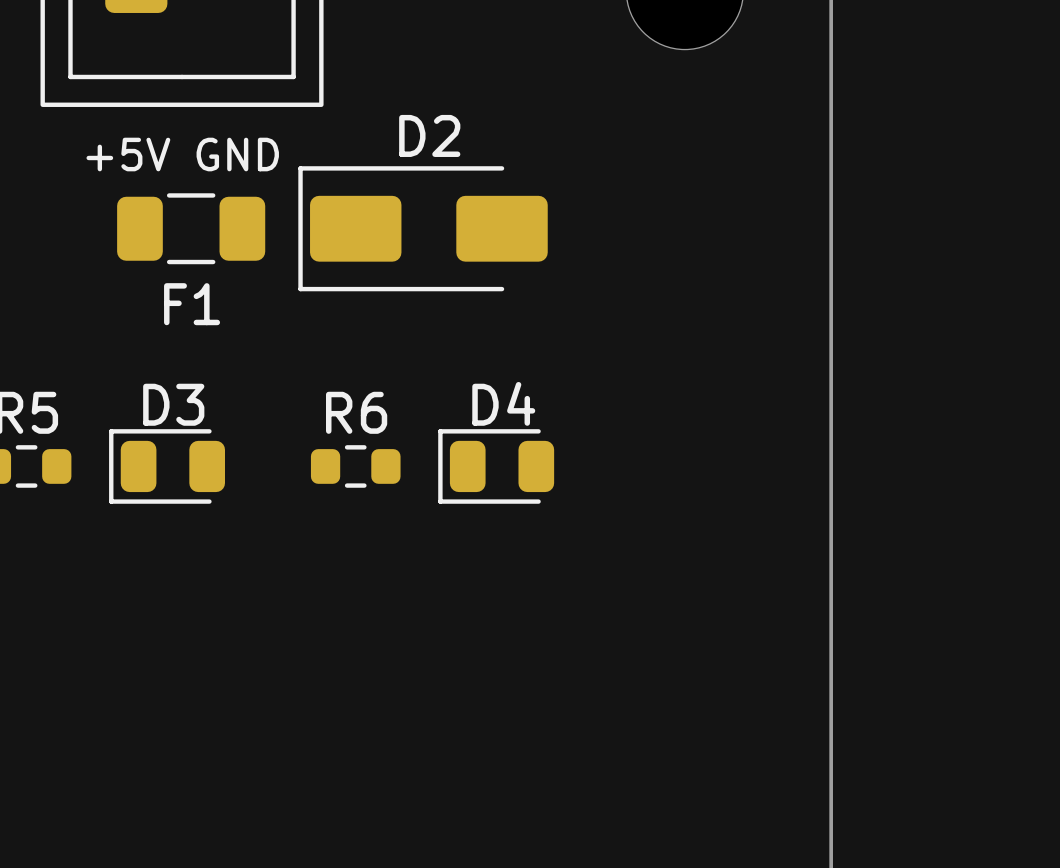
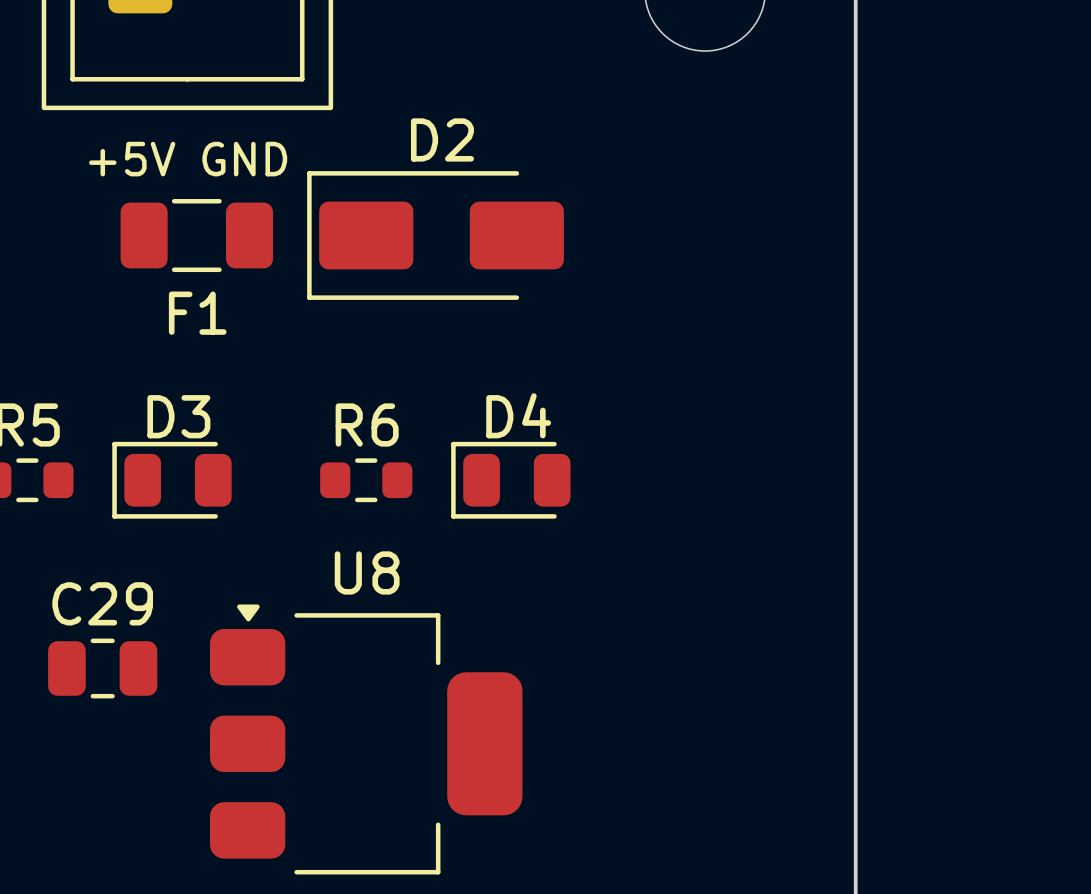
C29: none -> (102, 668)
U8: none -> (366, 739)

